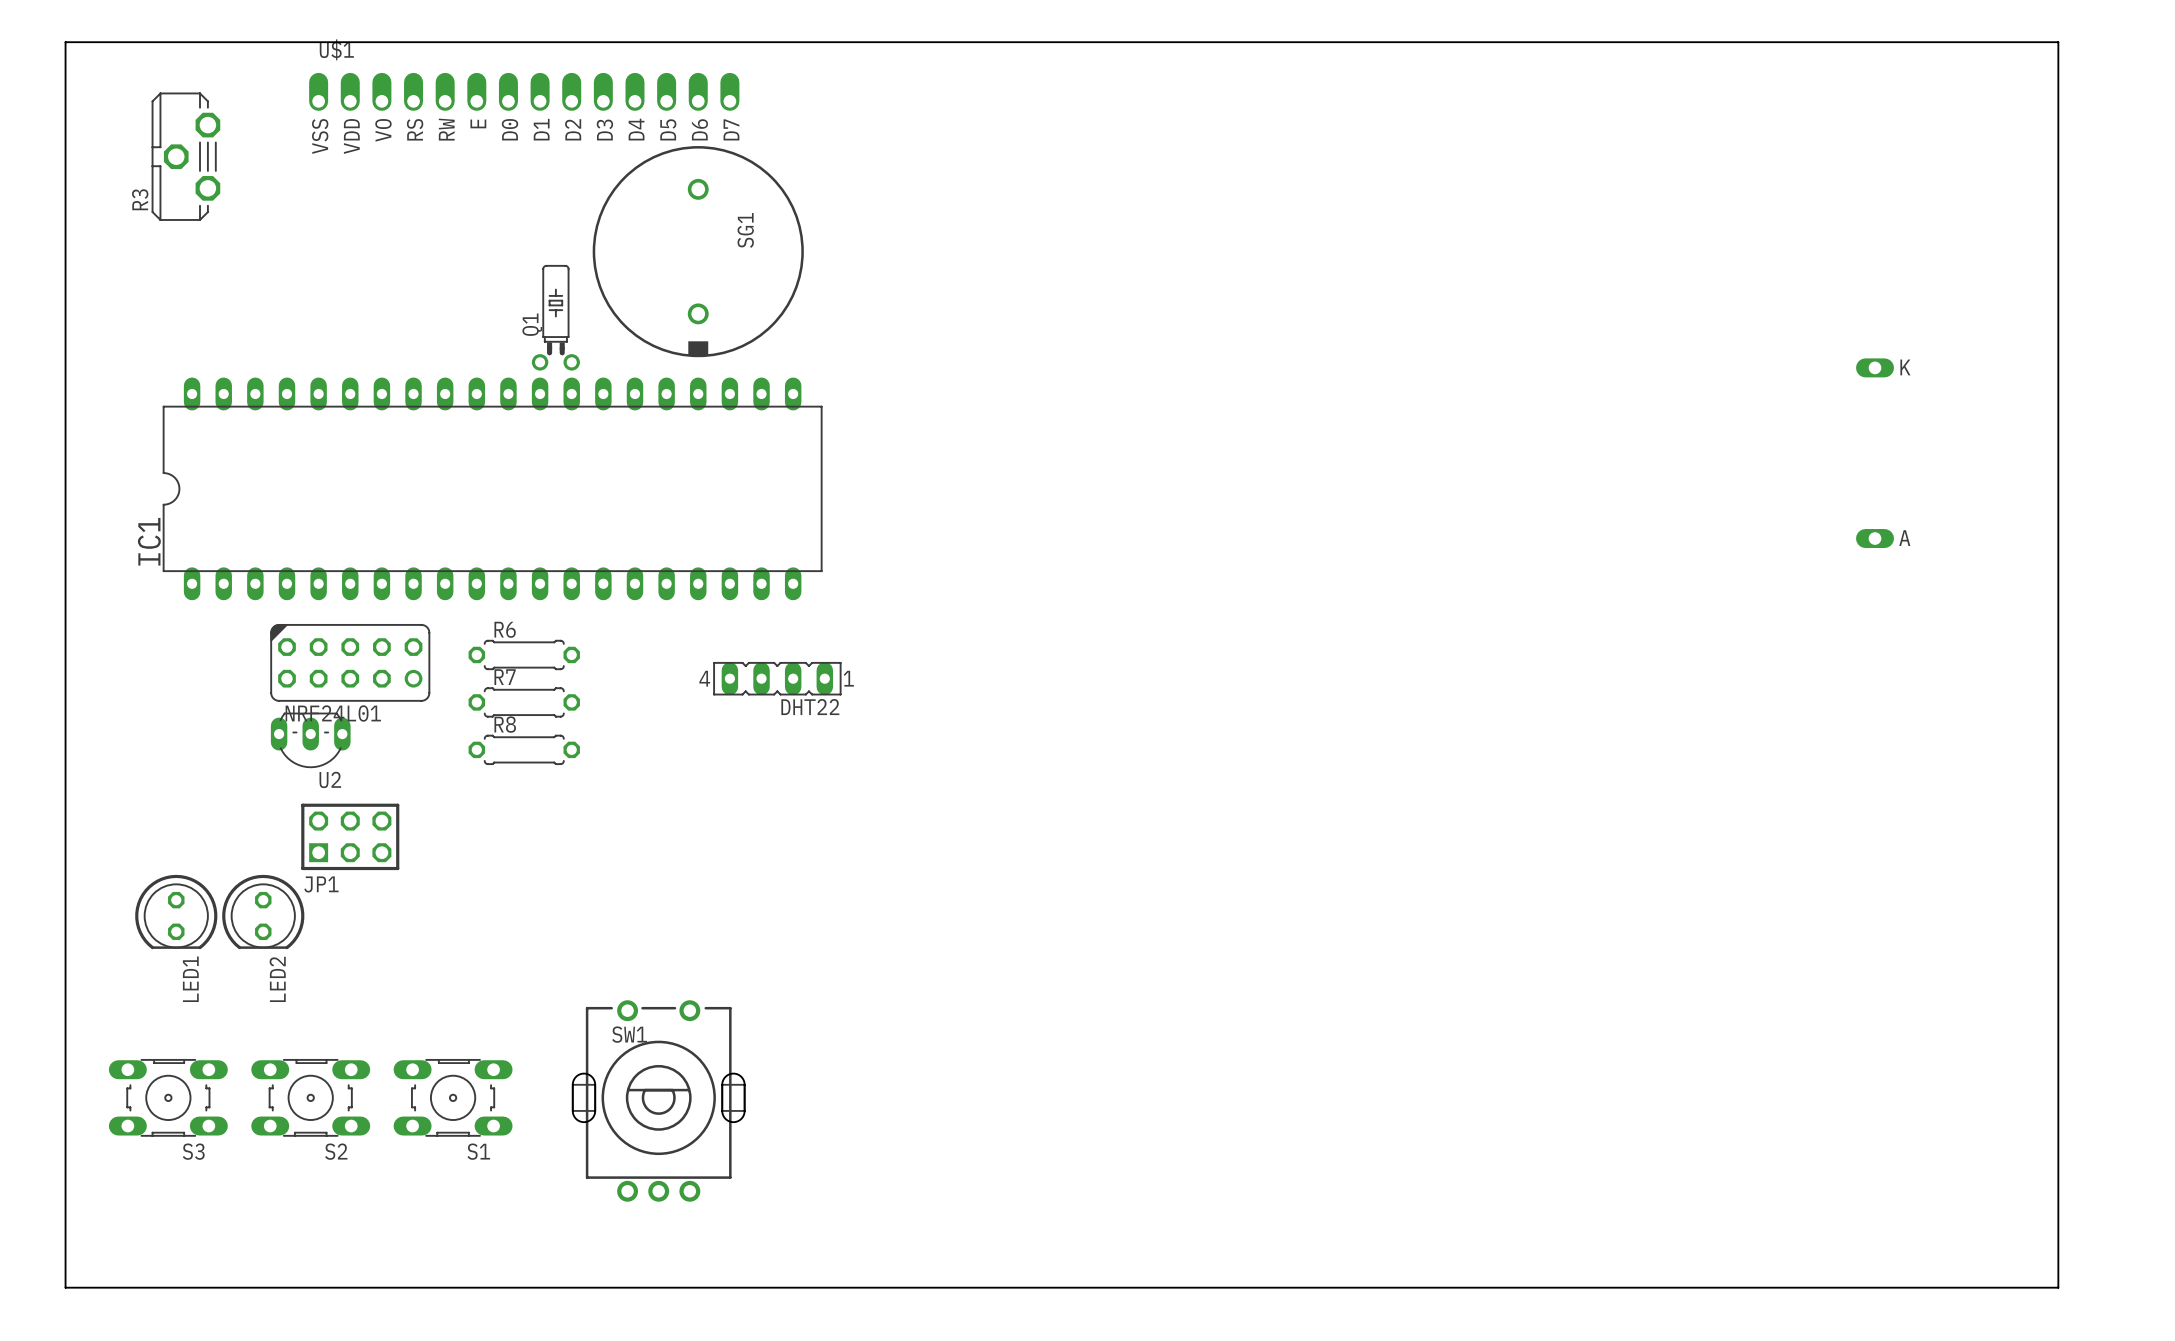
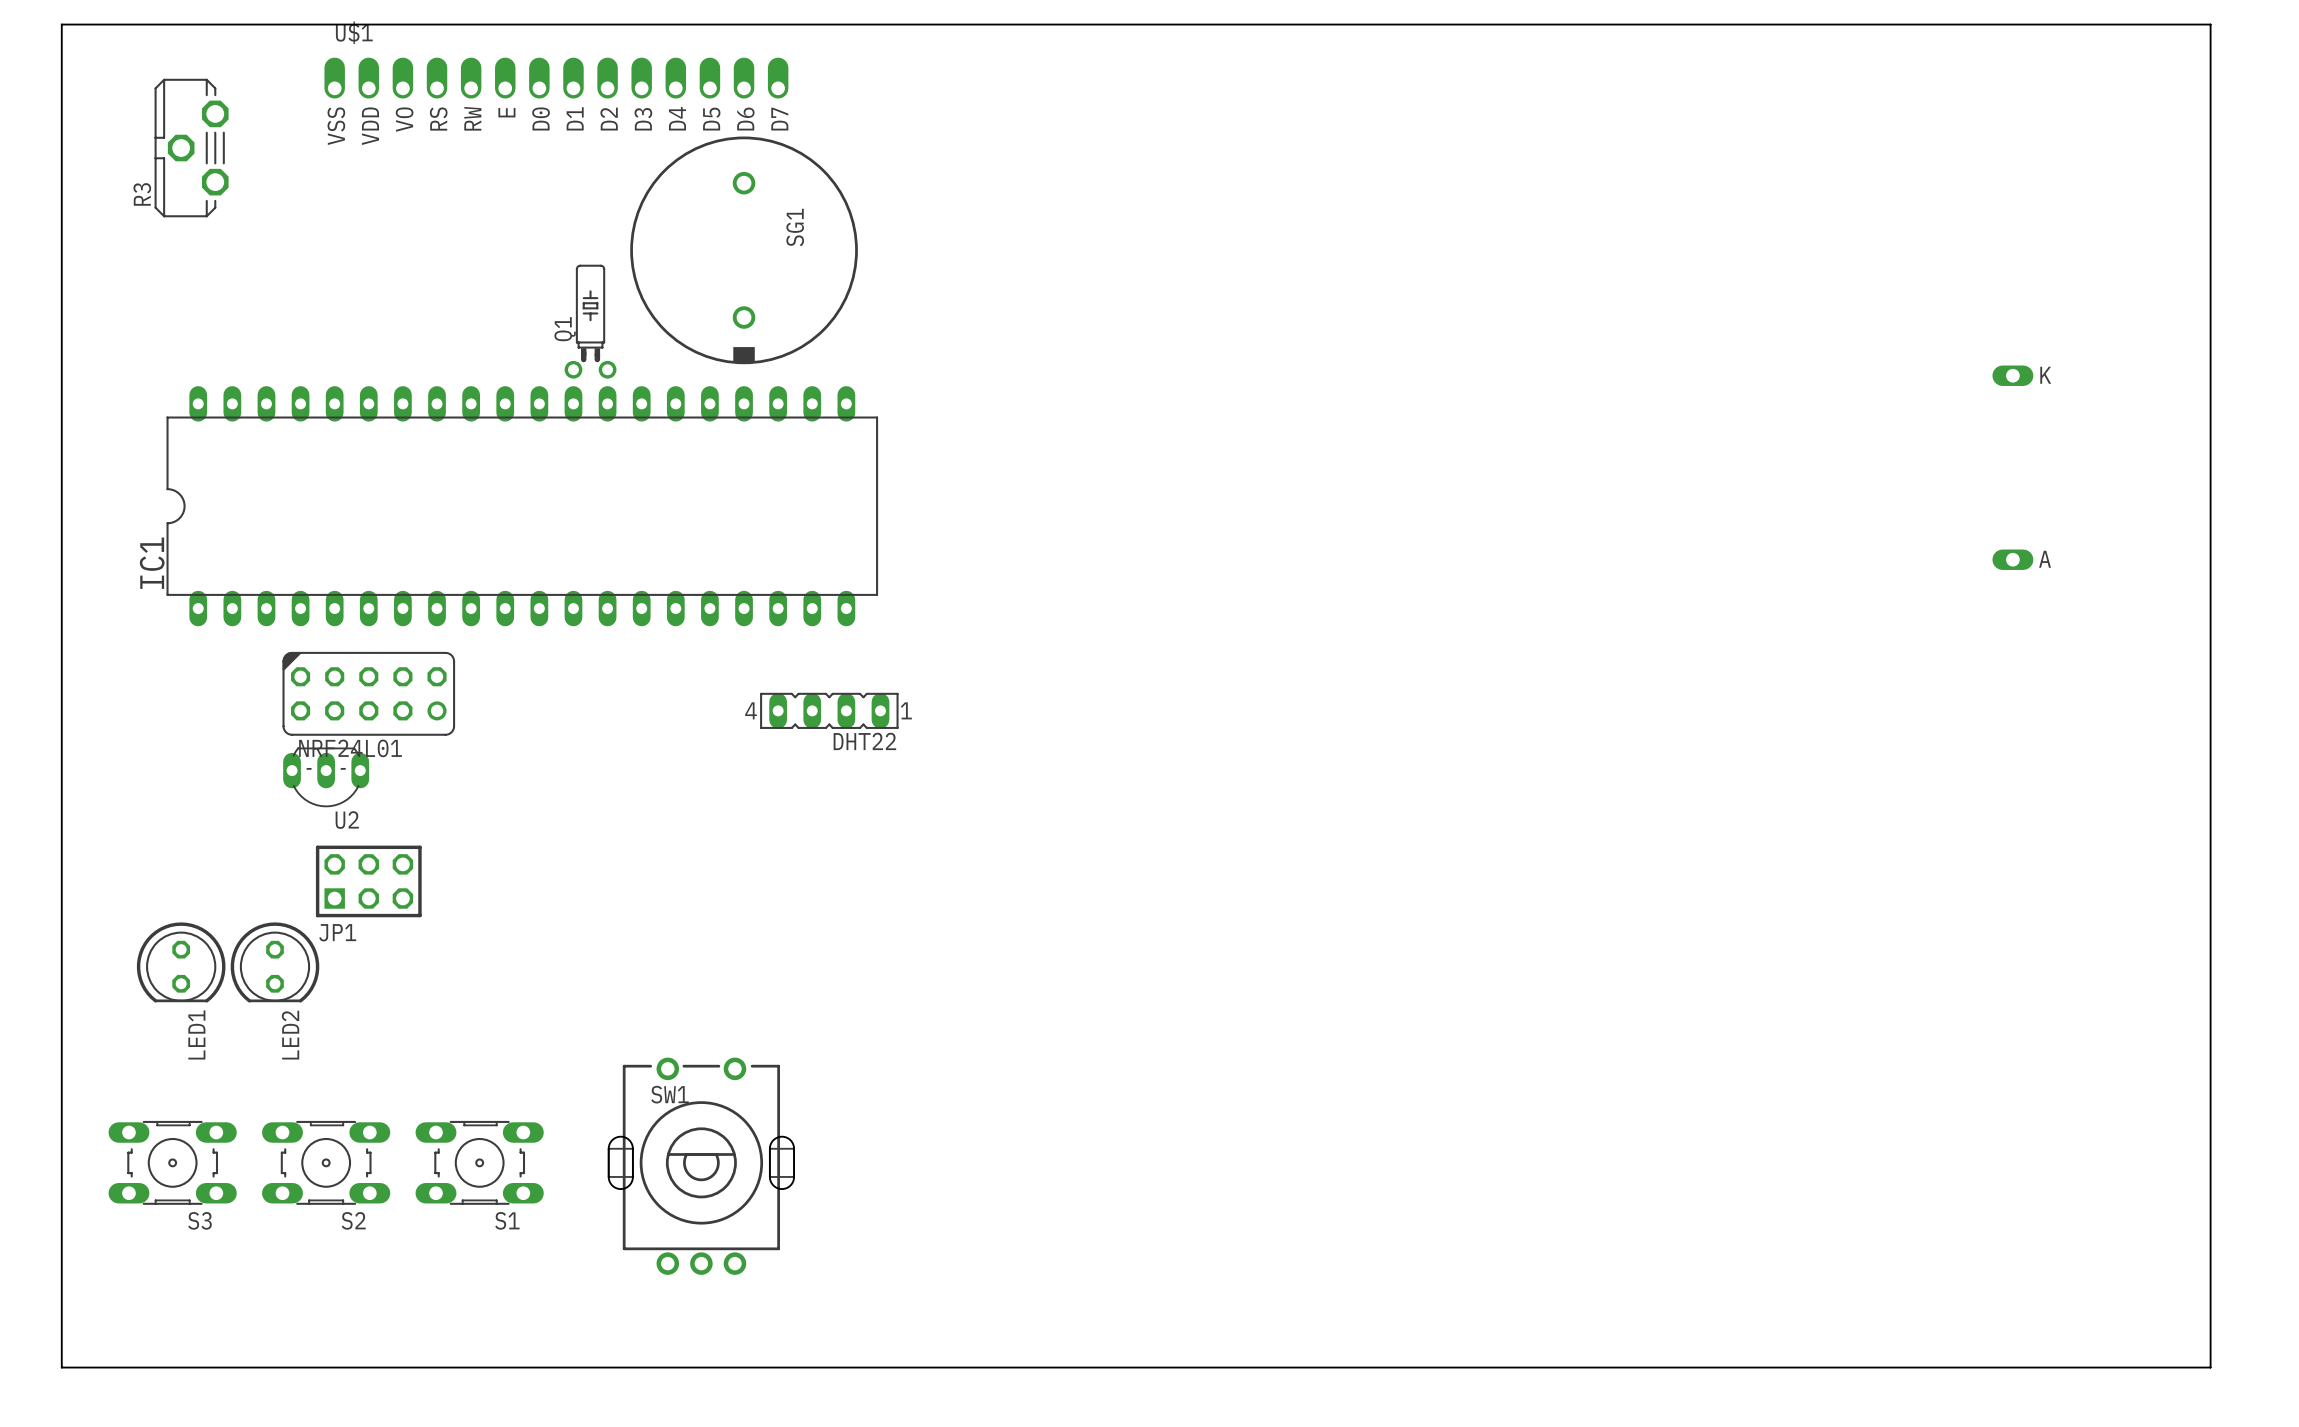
R6: (524, 654) -> none
R7: (524, 702) -> none
R8: (524, 749) -> none

